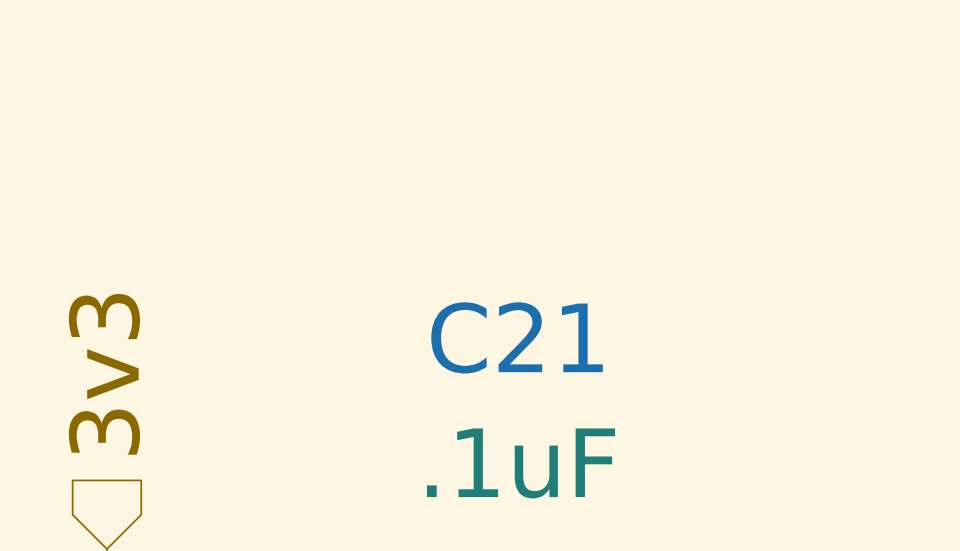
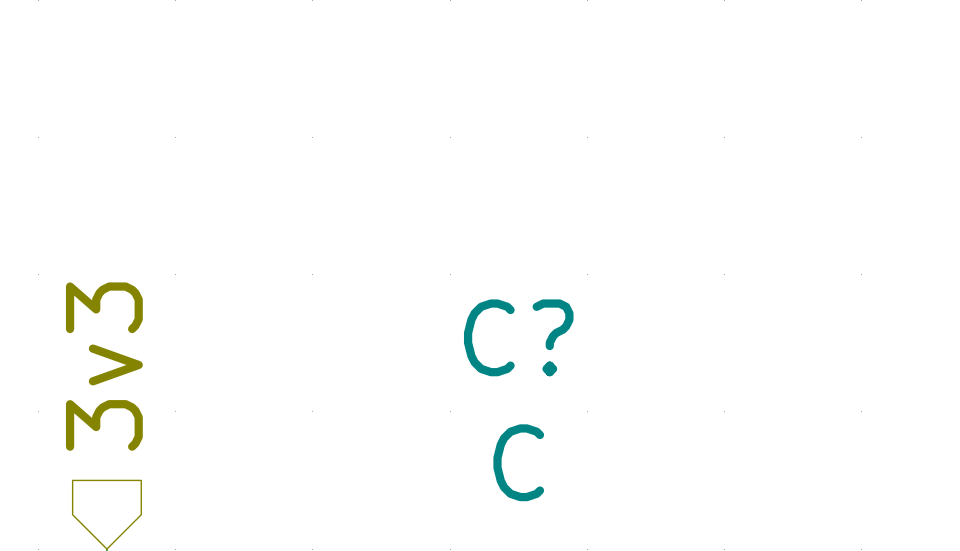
C21 name: C21 (517, 337) -> C? (518, 337)
C21 value: .1uF (521, 463) -> C (518, 462)

